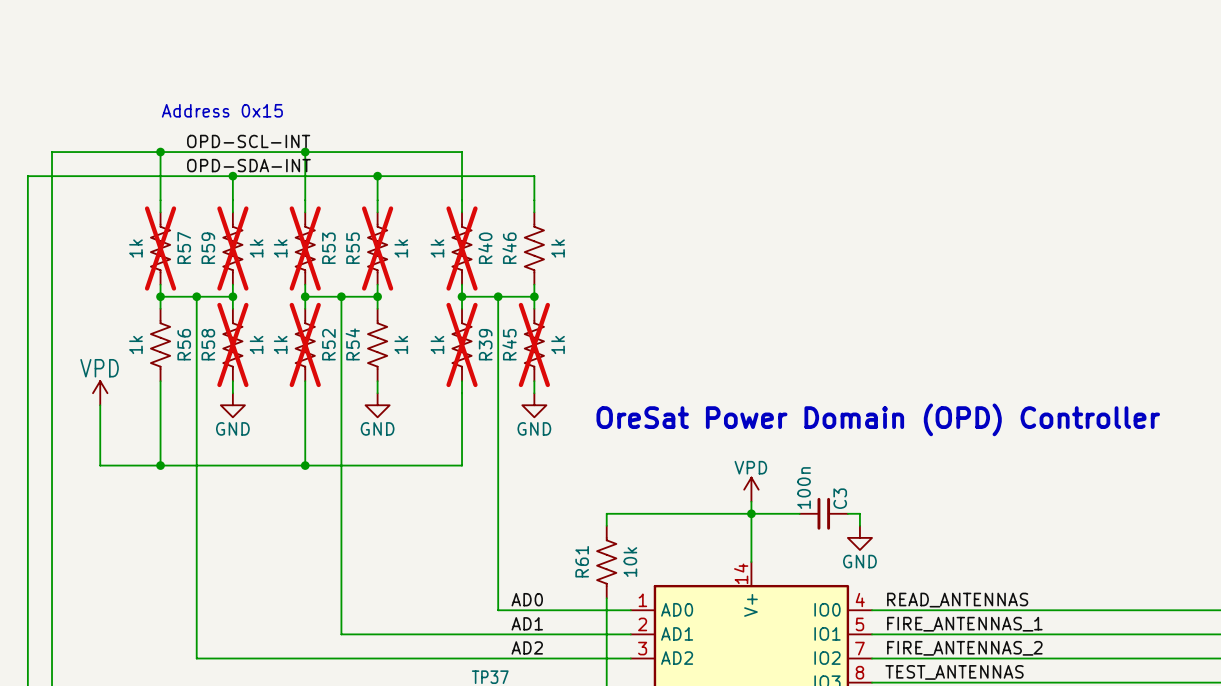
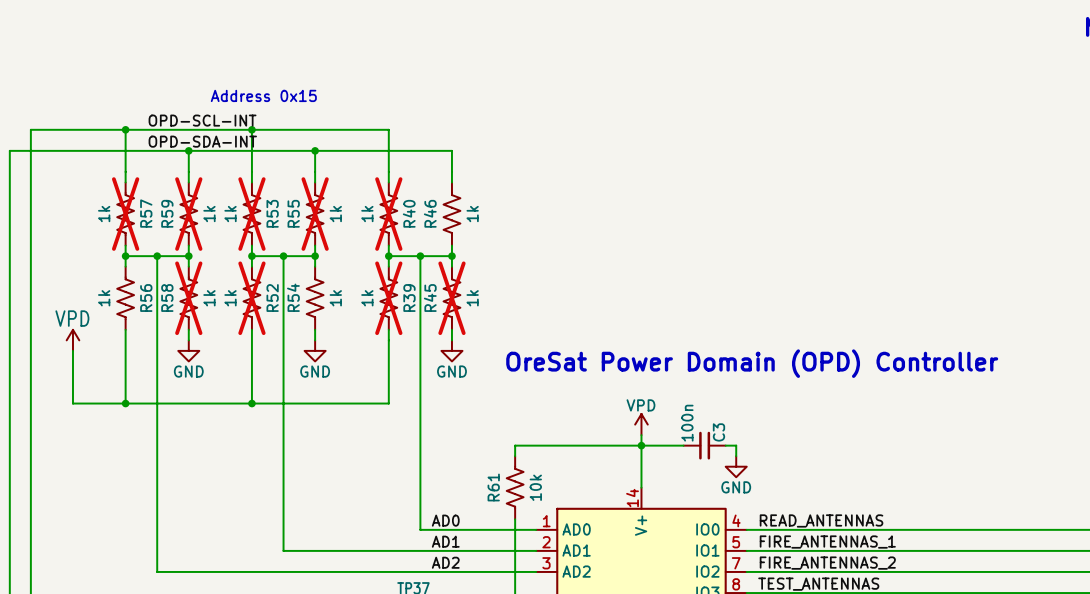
text position: Address 0x15 (222, 110) -> Address 0x15 (263, 95)

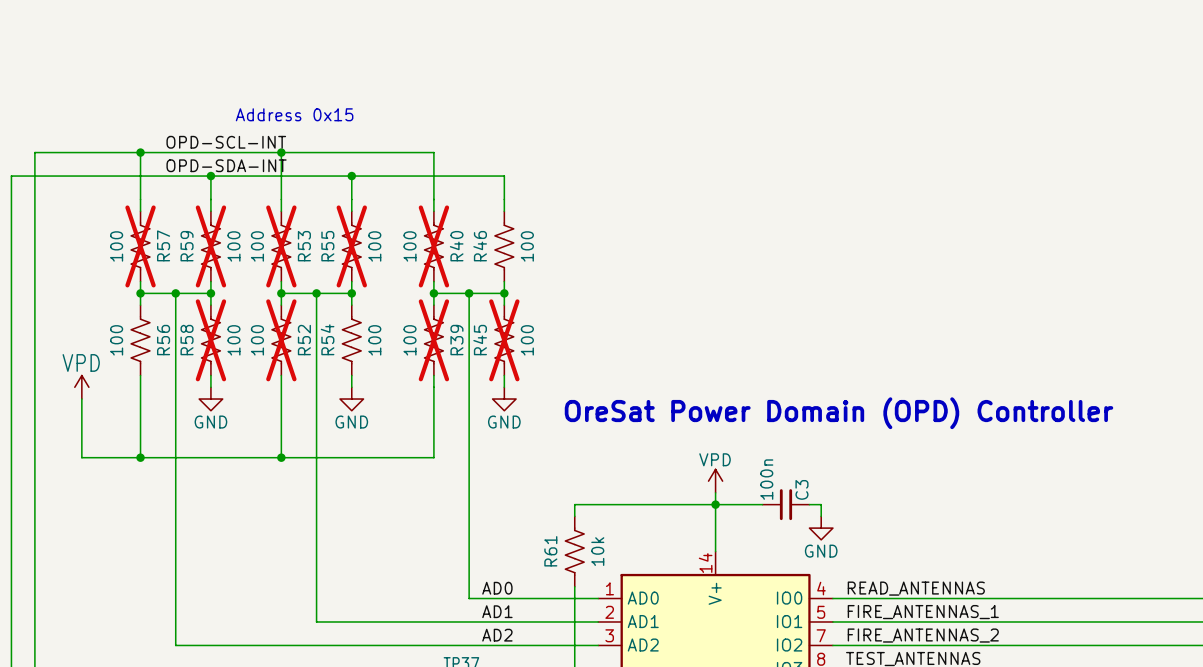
R57 value: 1k (104, 214) -> 100 (116, 246)
R59 value: 1k (209, 214) -> 100 (233, 246)
R53 value: 1k (230, 214) -> 100 (257, 246)
R55 value: 1k (335, 214) -> 100 (374, 246)
R40 value: 1k (367, 214) -> 100 (410, 246)
R46 value: 1k (472, 214) -> 100 (527, 246)
R56 value: 1k (104, 298) -> 100 (116, 340)
R58 value: 1k (209, 298) -> 100 (233, 340)
R52 value: 1k (230, 298) -> 100 (257, 340)
R54 value: 1k (335, 298) -> 100 (374, 340)
R39 value: 1k (367, 298) -> 100 (410, 340)
R45 value: 1k (472, 298) -> 100 (527, 340)

